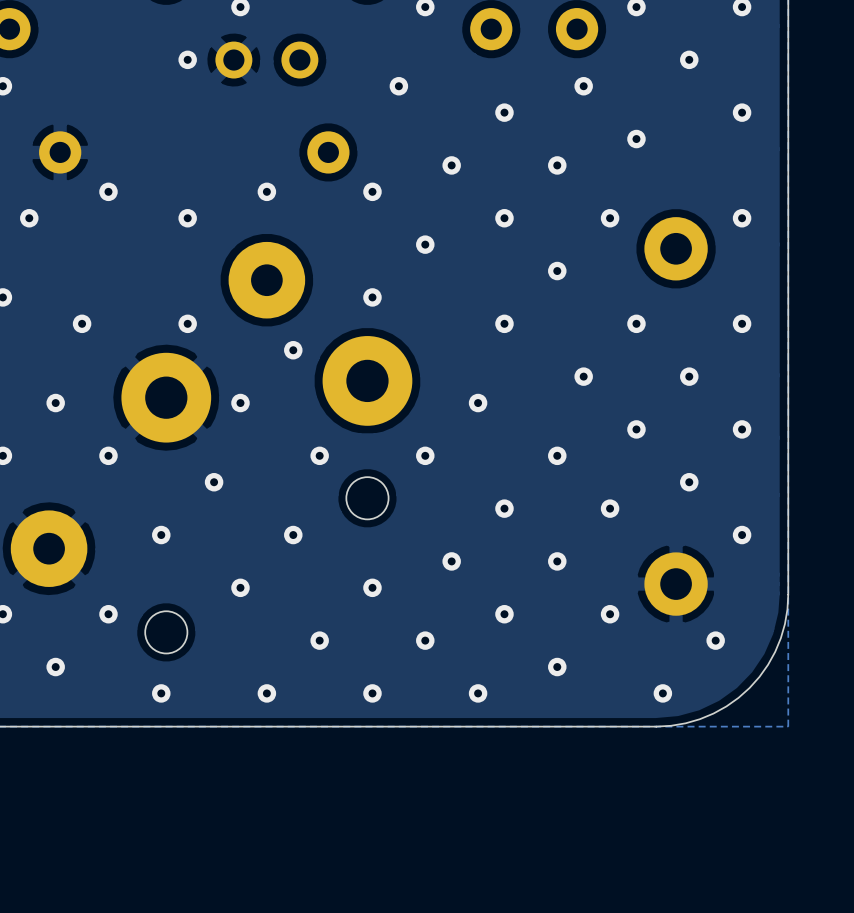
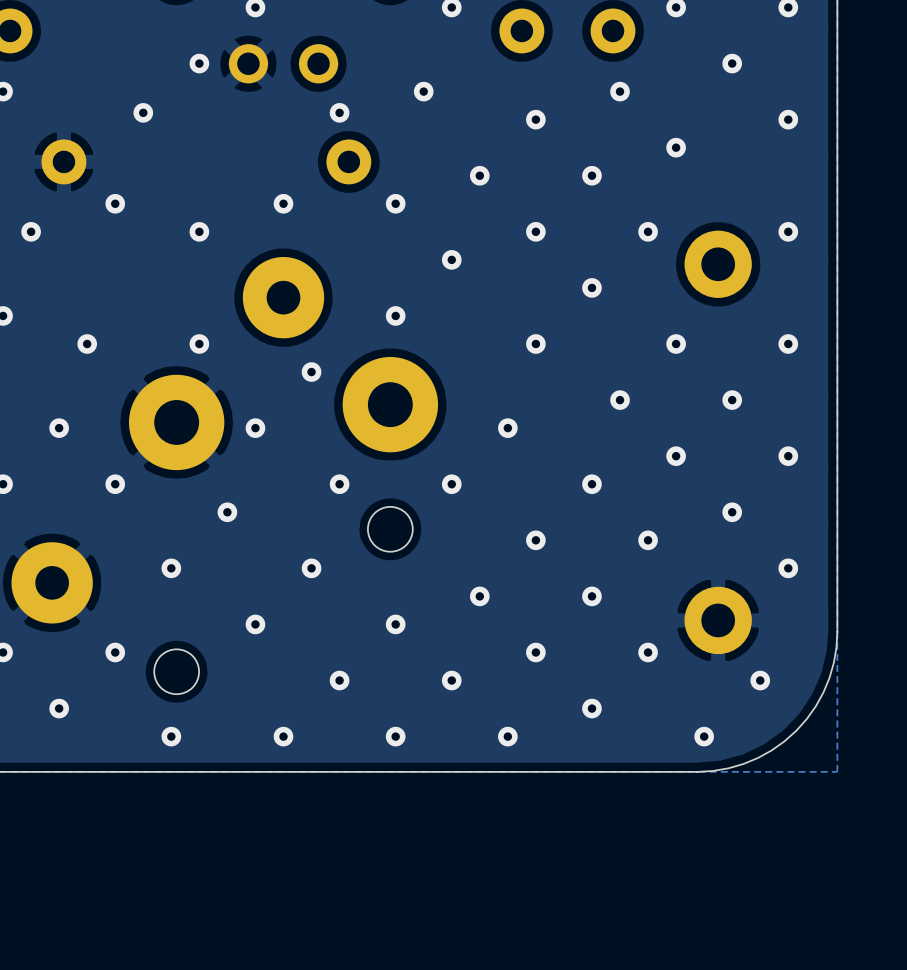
via: none -> (143, 112)
via: none -> (339, 112)

